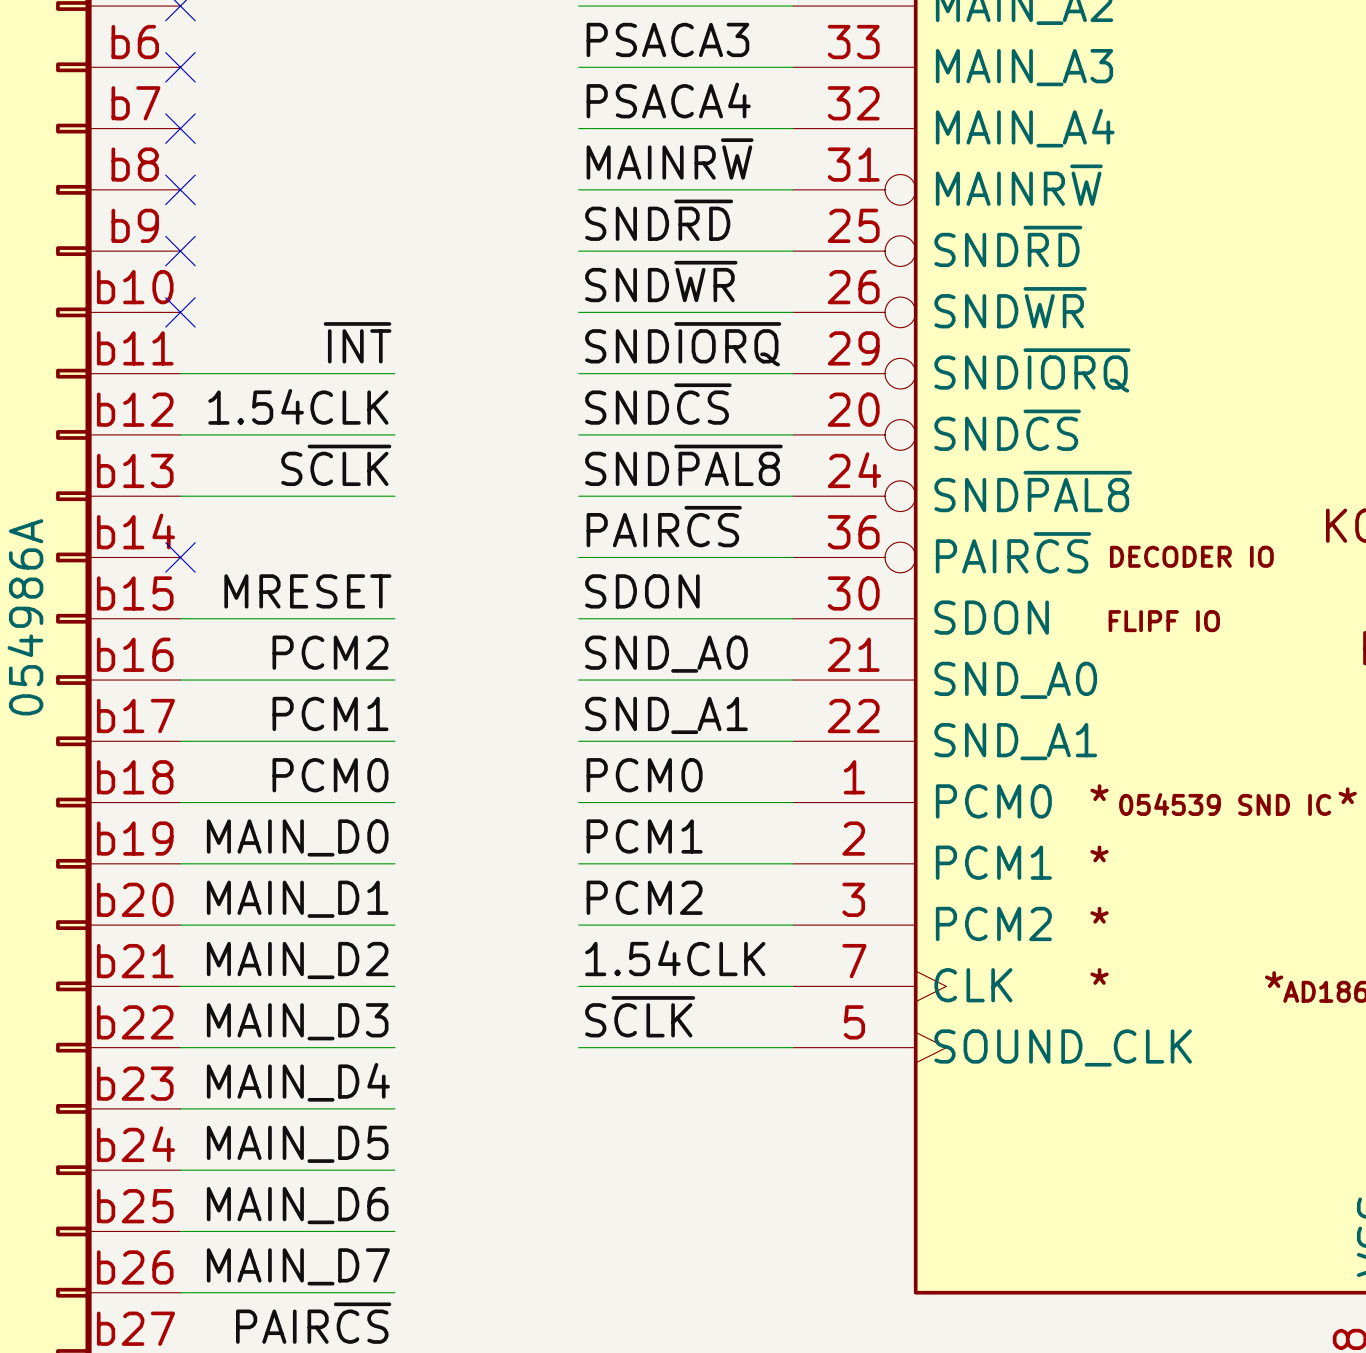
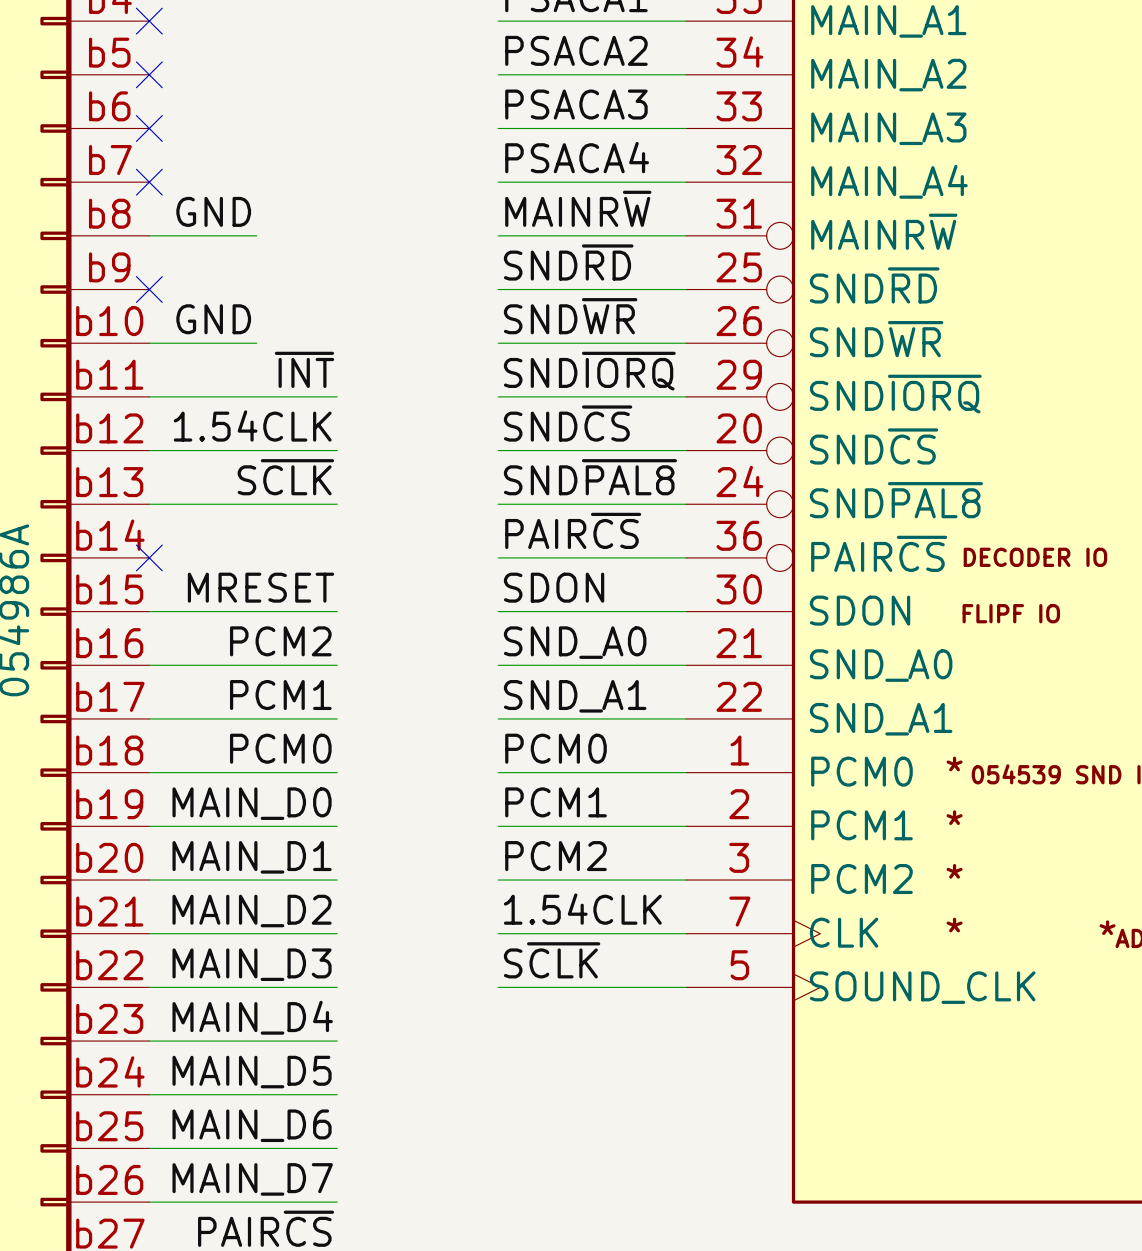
label: none -> GND (213, 211)
wire: none -> (149, 235) (256, 235)
no-connect mark: (180, 189) -> none
label: none -> GND (213, 319)
wire: none -> (149, 343) (256, 343)
no-connect mark: (180, 312) -> none

